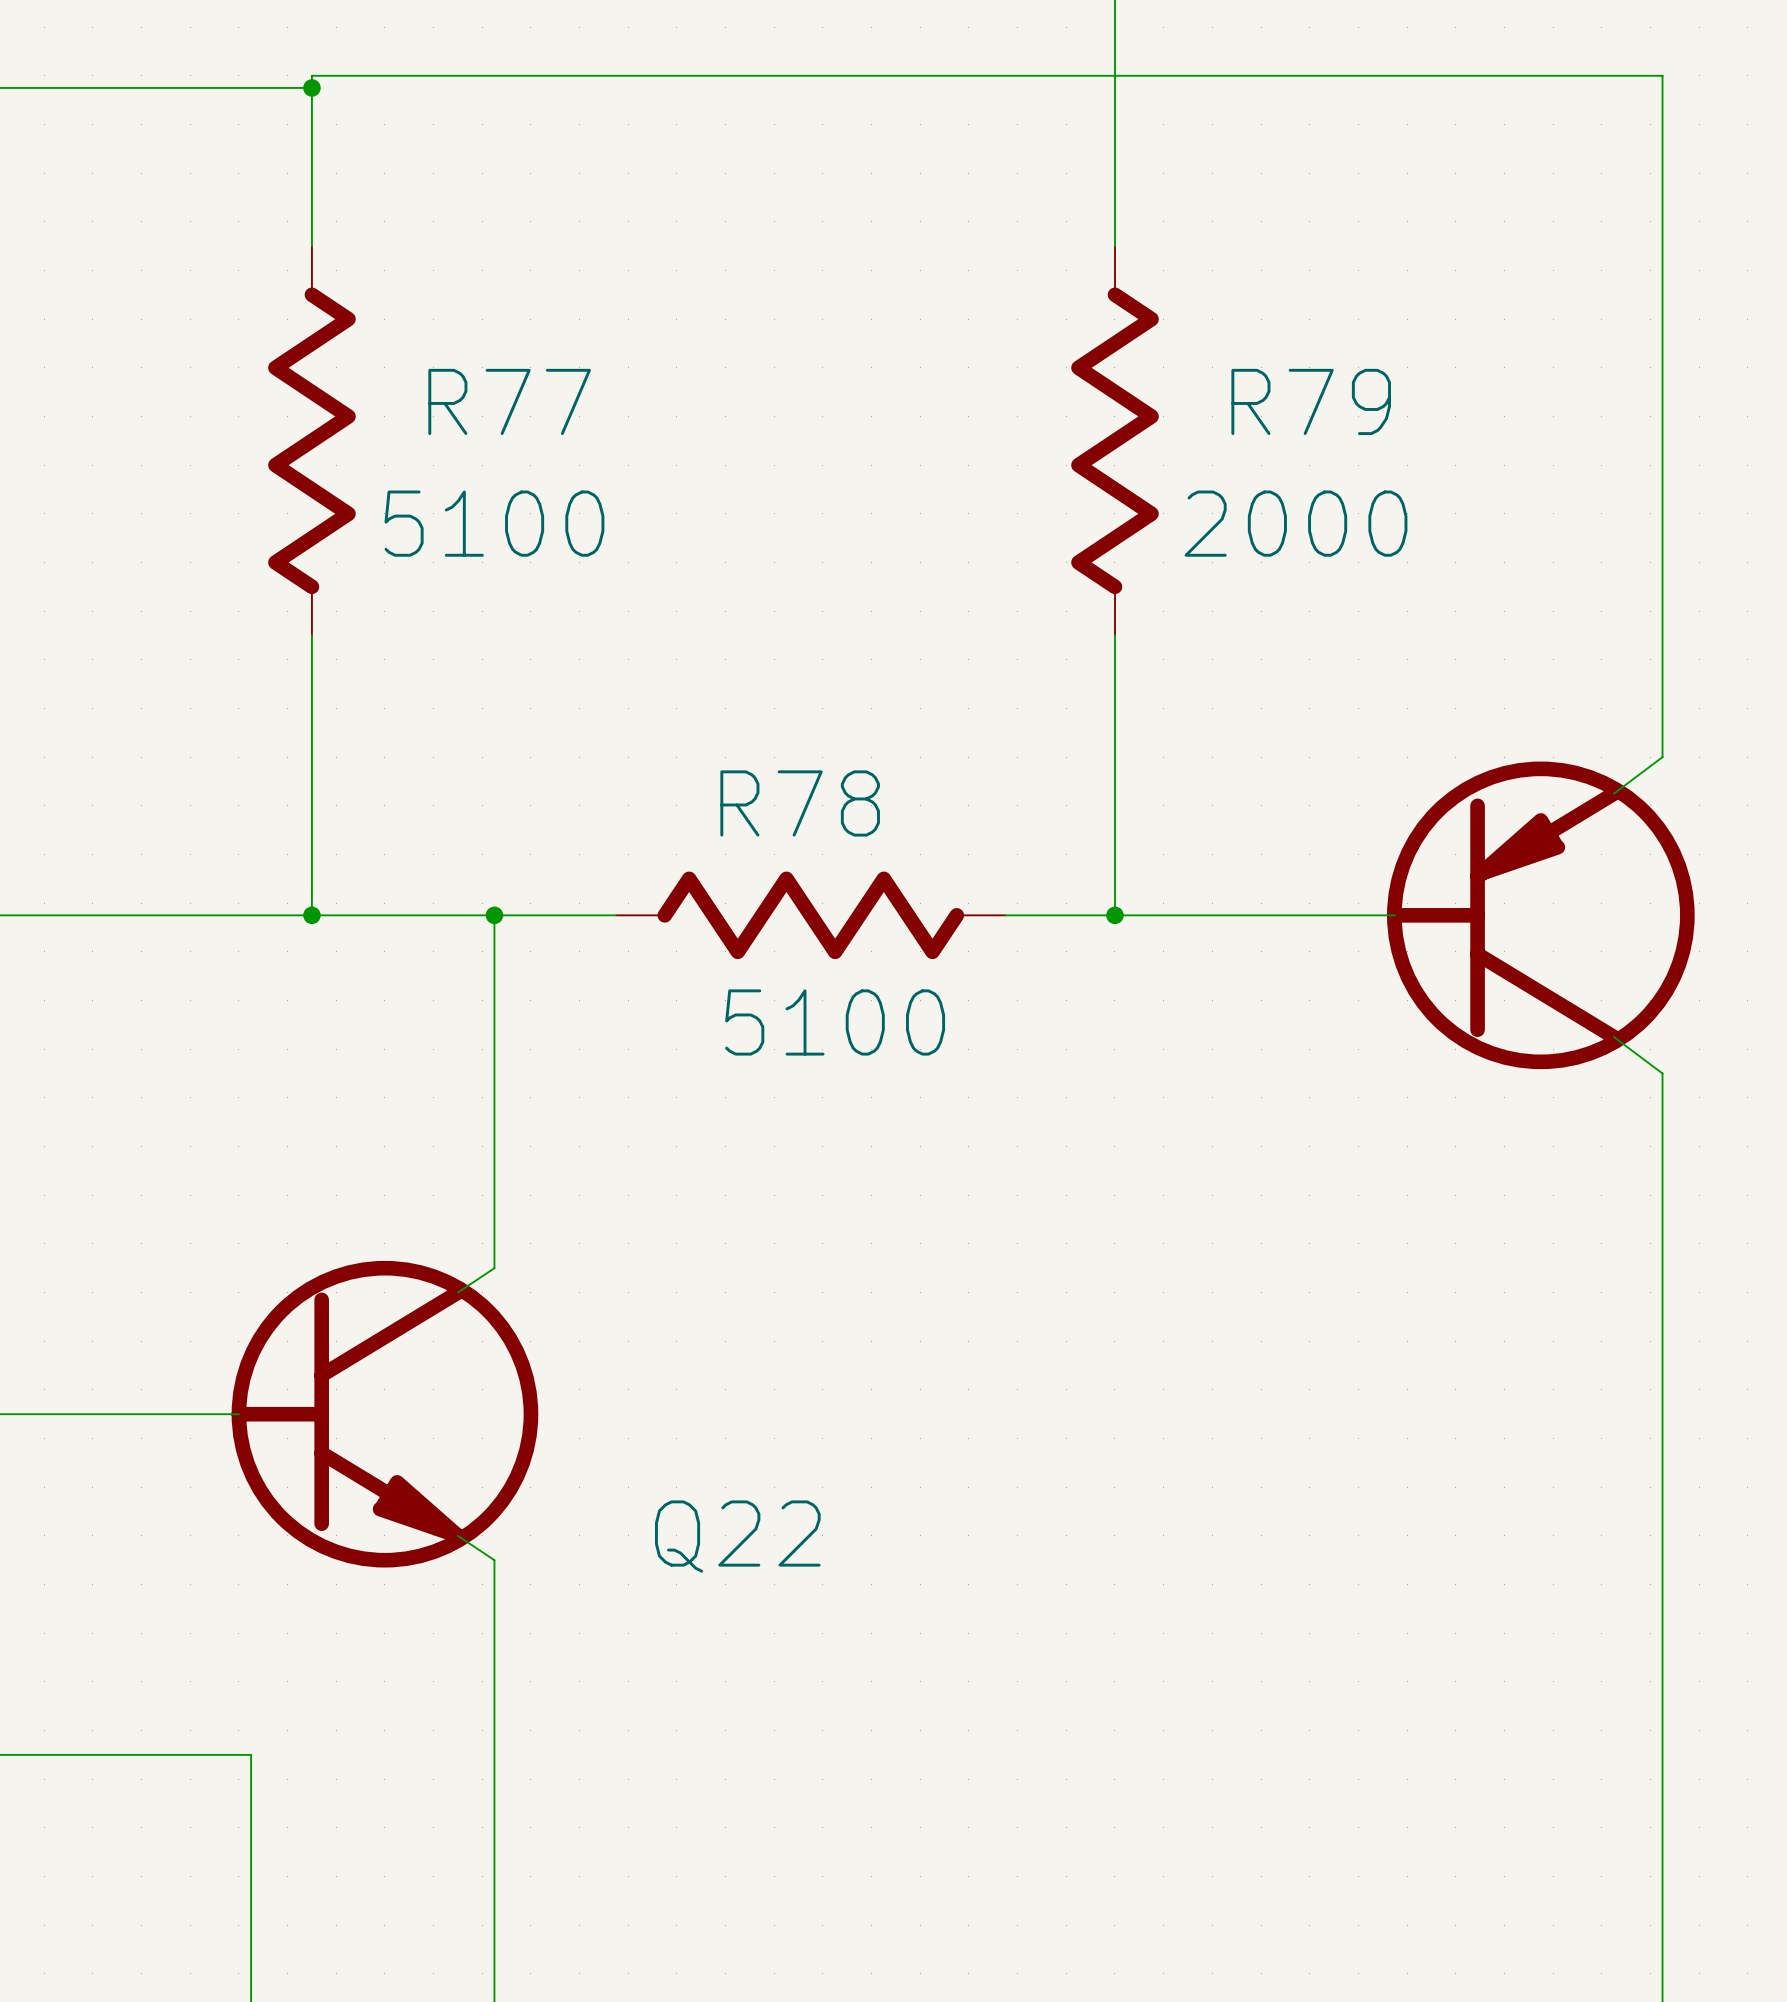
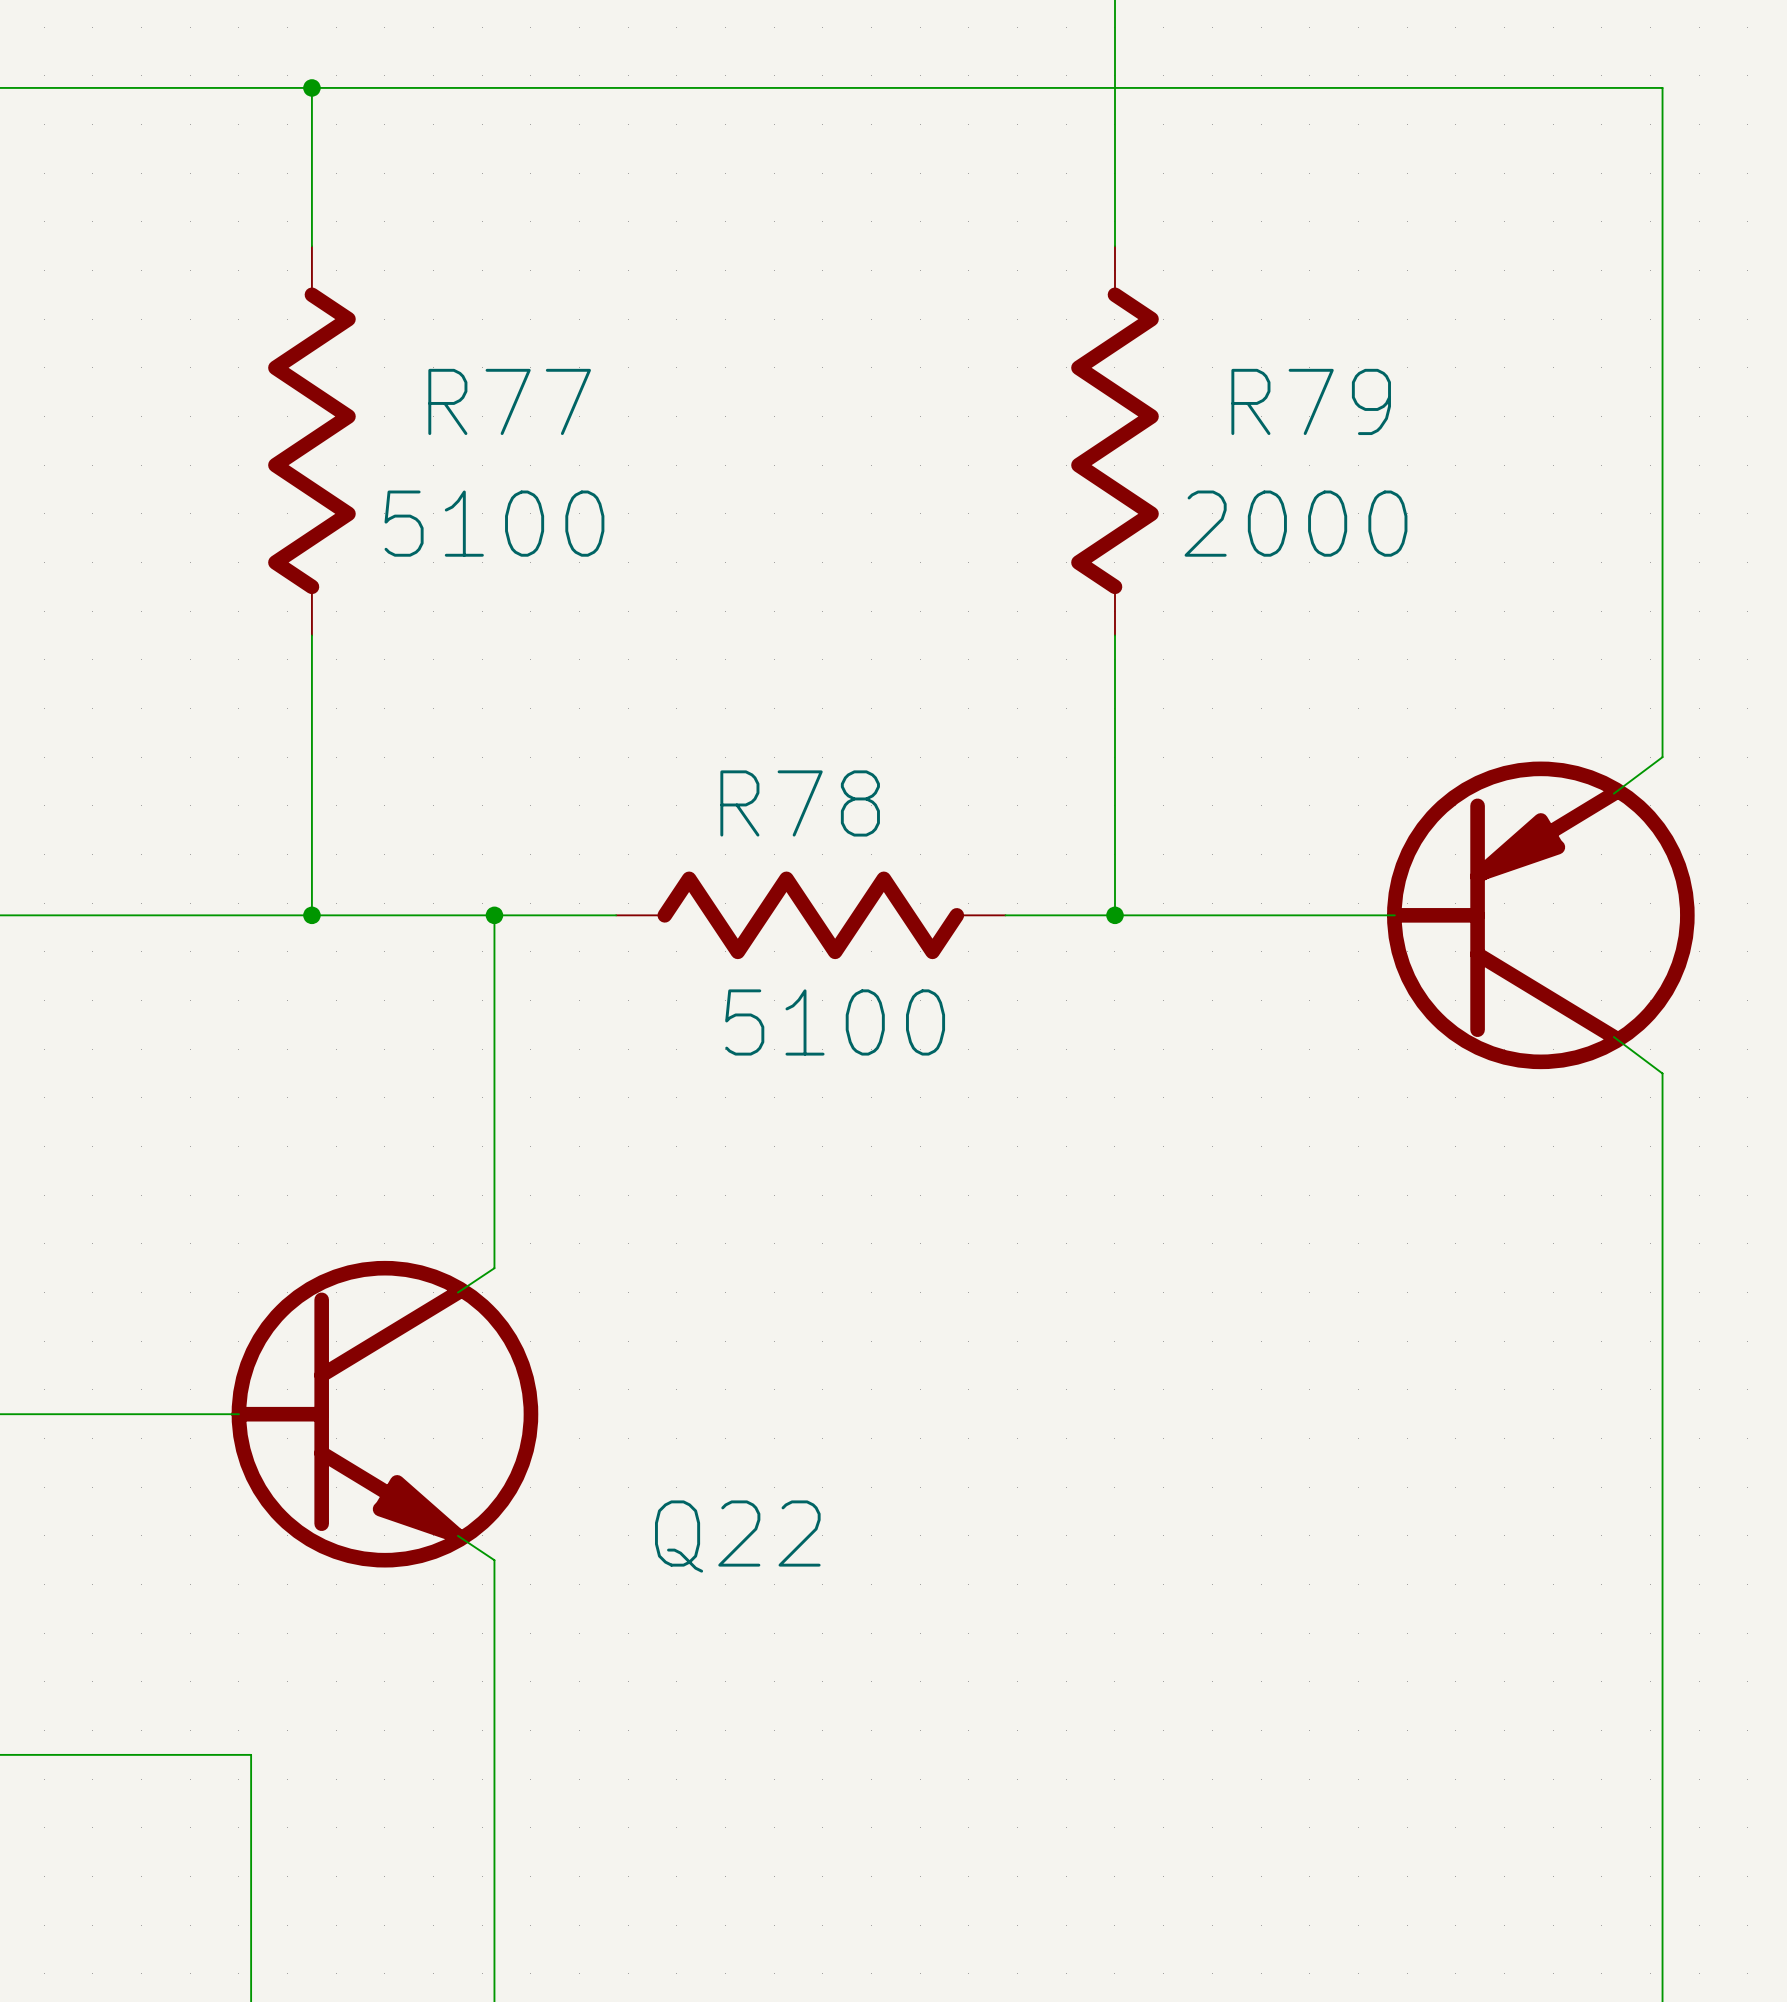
wire: (311, 87) (311, 75) (1662, 75) (1662, 87) -> (311, 87) (1662, 87)

